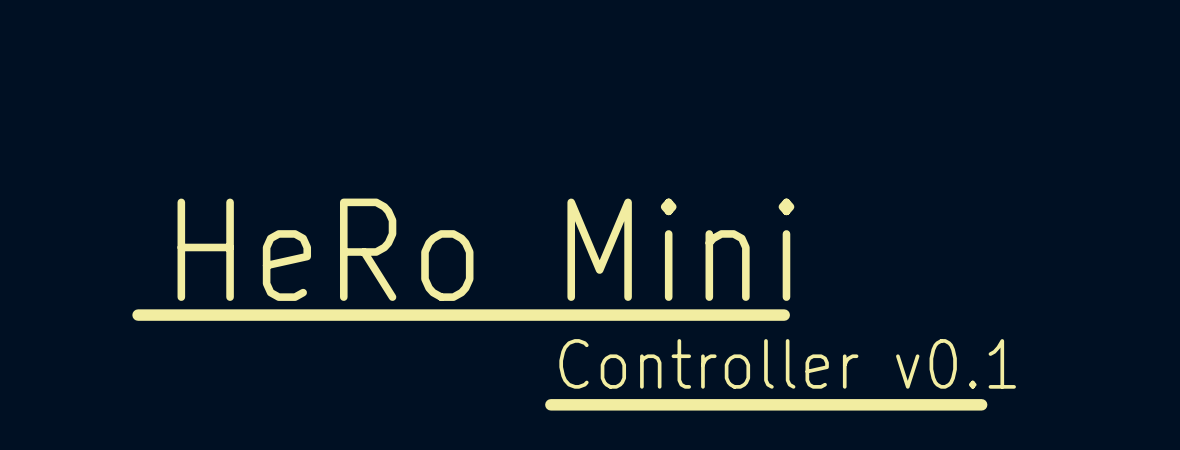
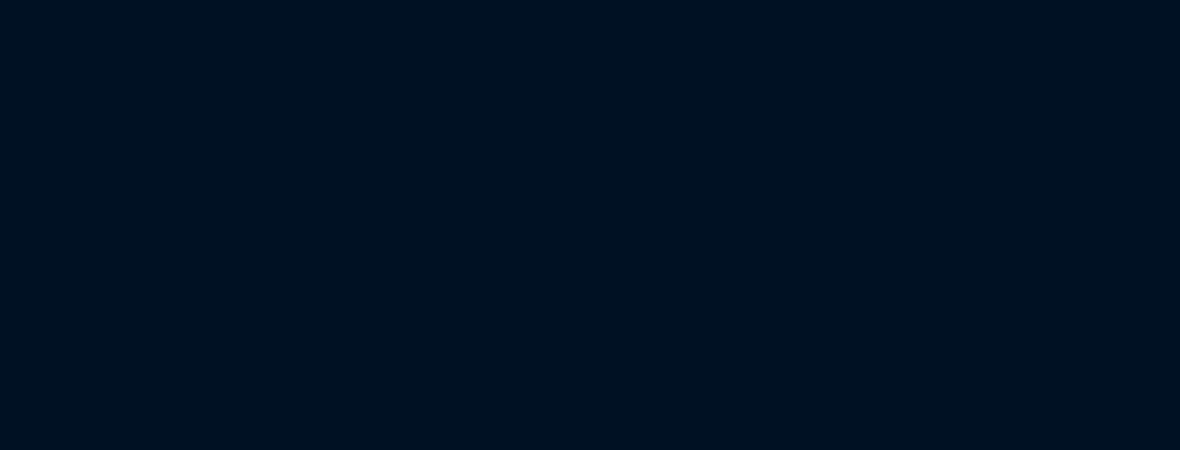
text: HeRo Mini (485, 249) -> none
line: (138, 315) (784, 315) -> none
text: Controller v0.1 (787, 363) -> none
line: (550, 404) (981, 404) -> none

